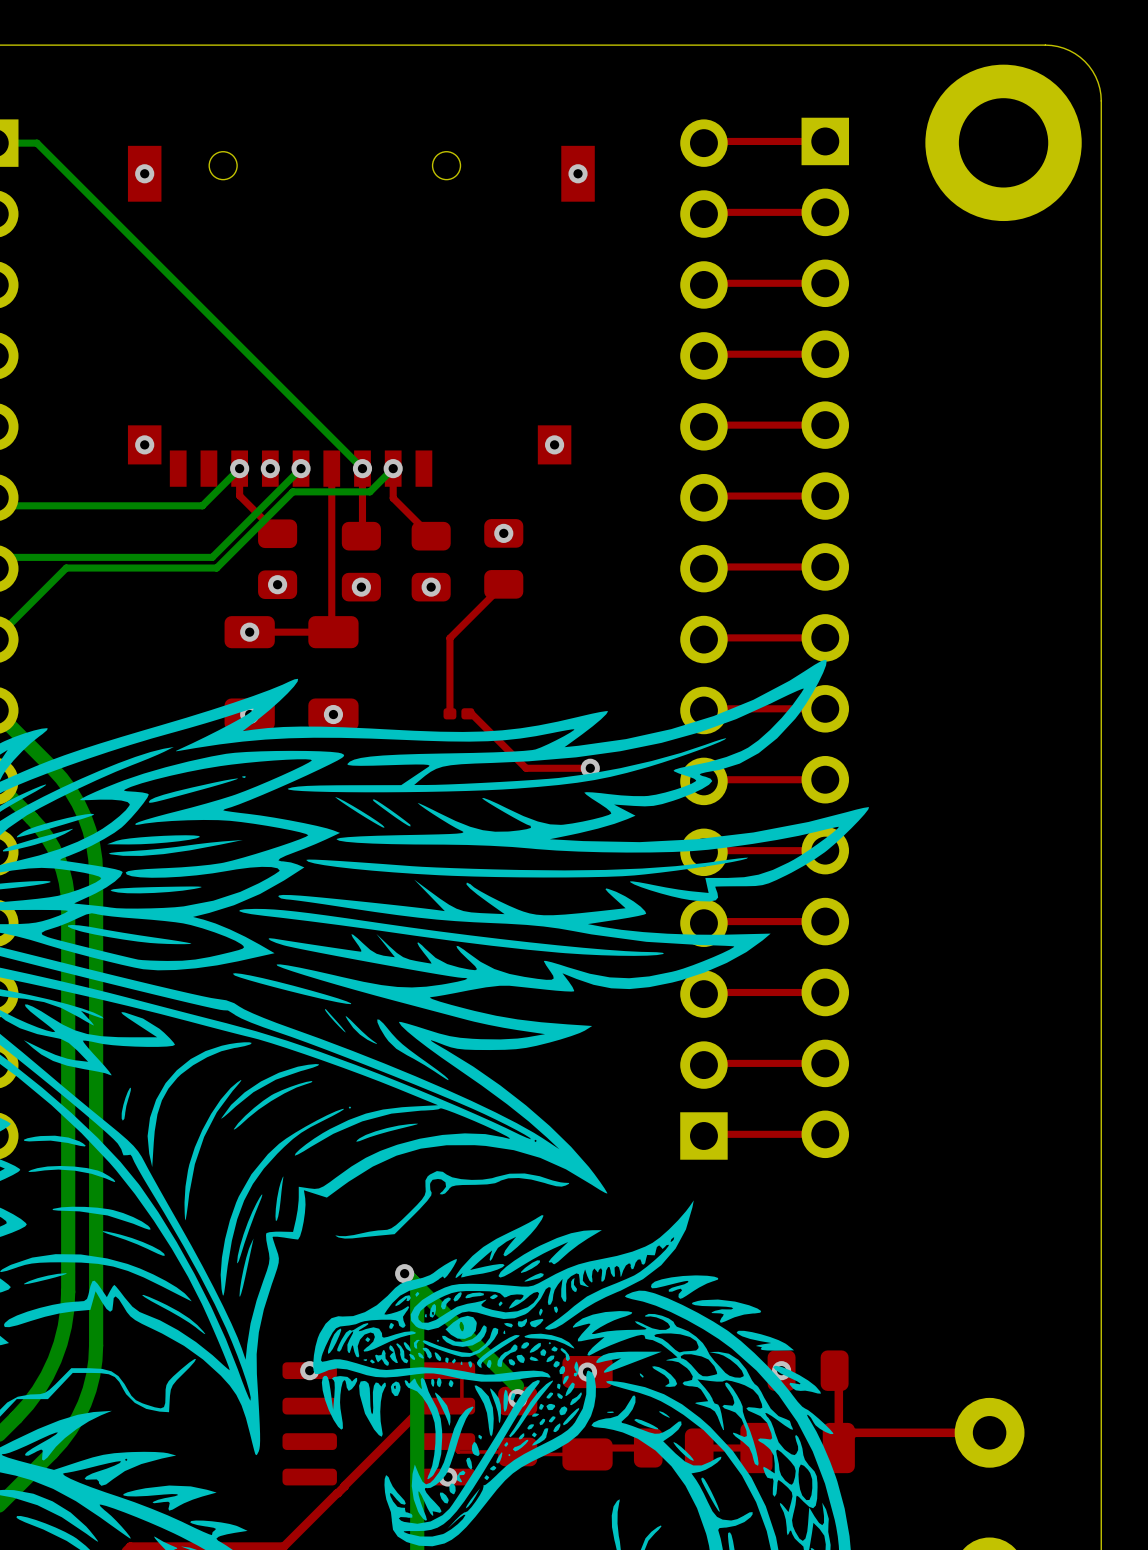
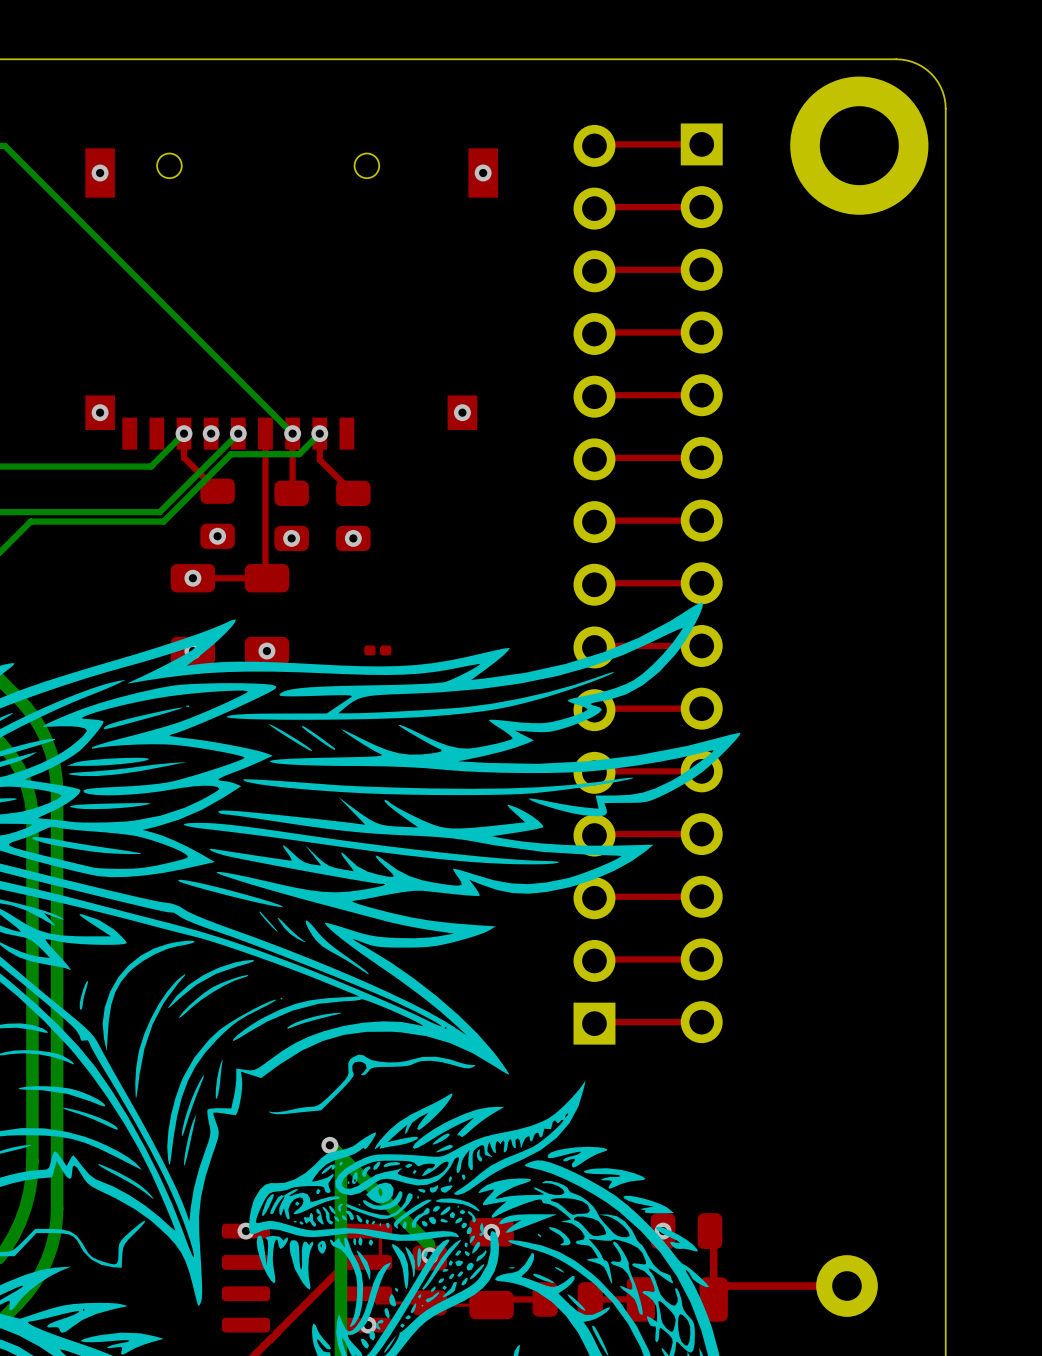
via: (503, 533) -> none
part: (503, 558) -> none
top track: (503, 584) (449, 638) (449, 713) -> none
top track: (467, 713) (471, 713) (526, 768) (590, 768) -> none
via: (590, 768) -> none

